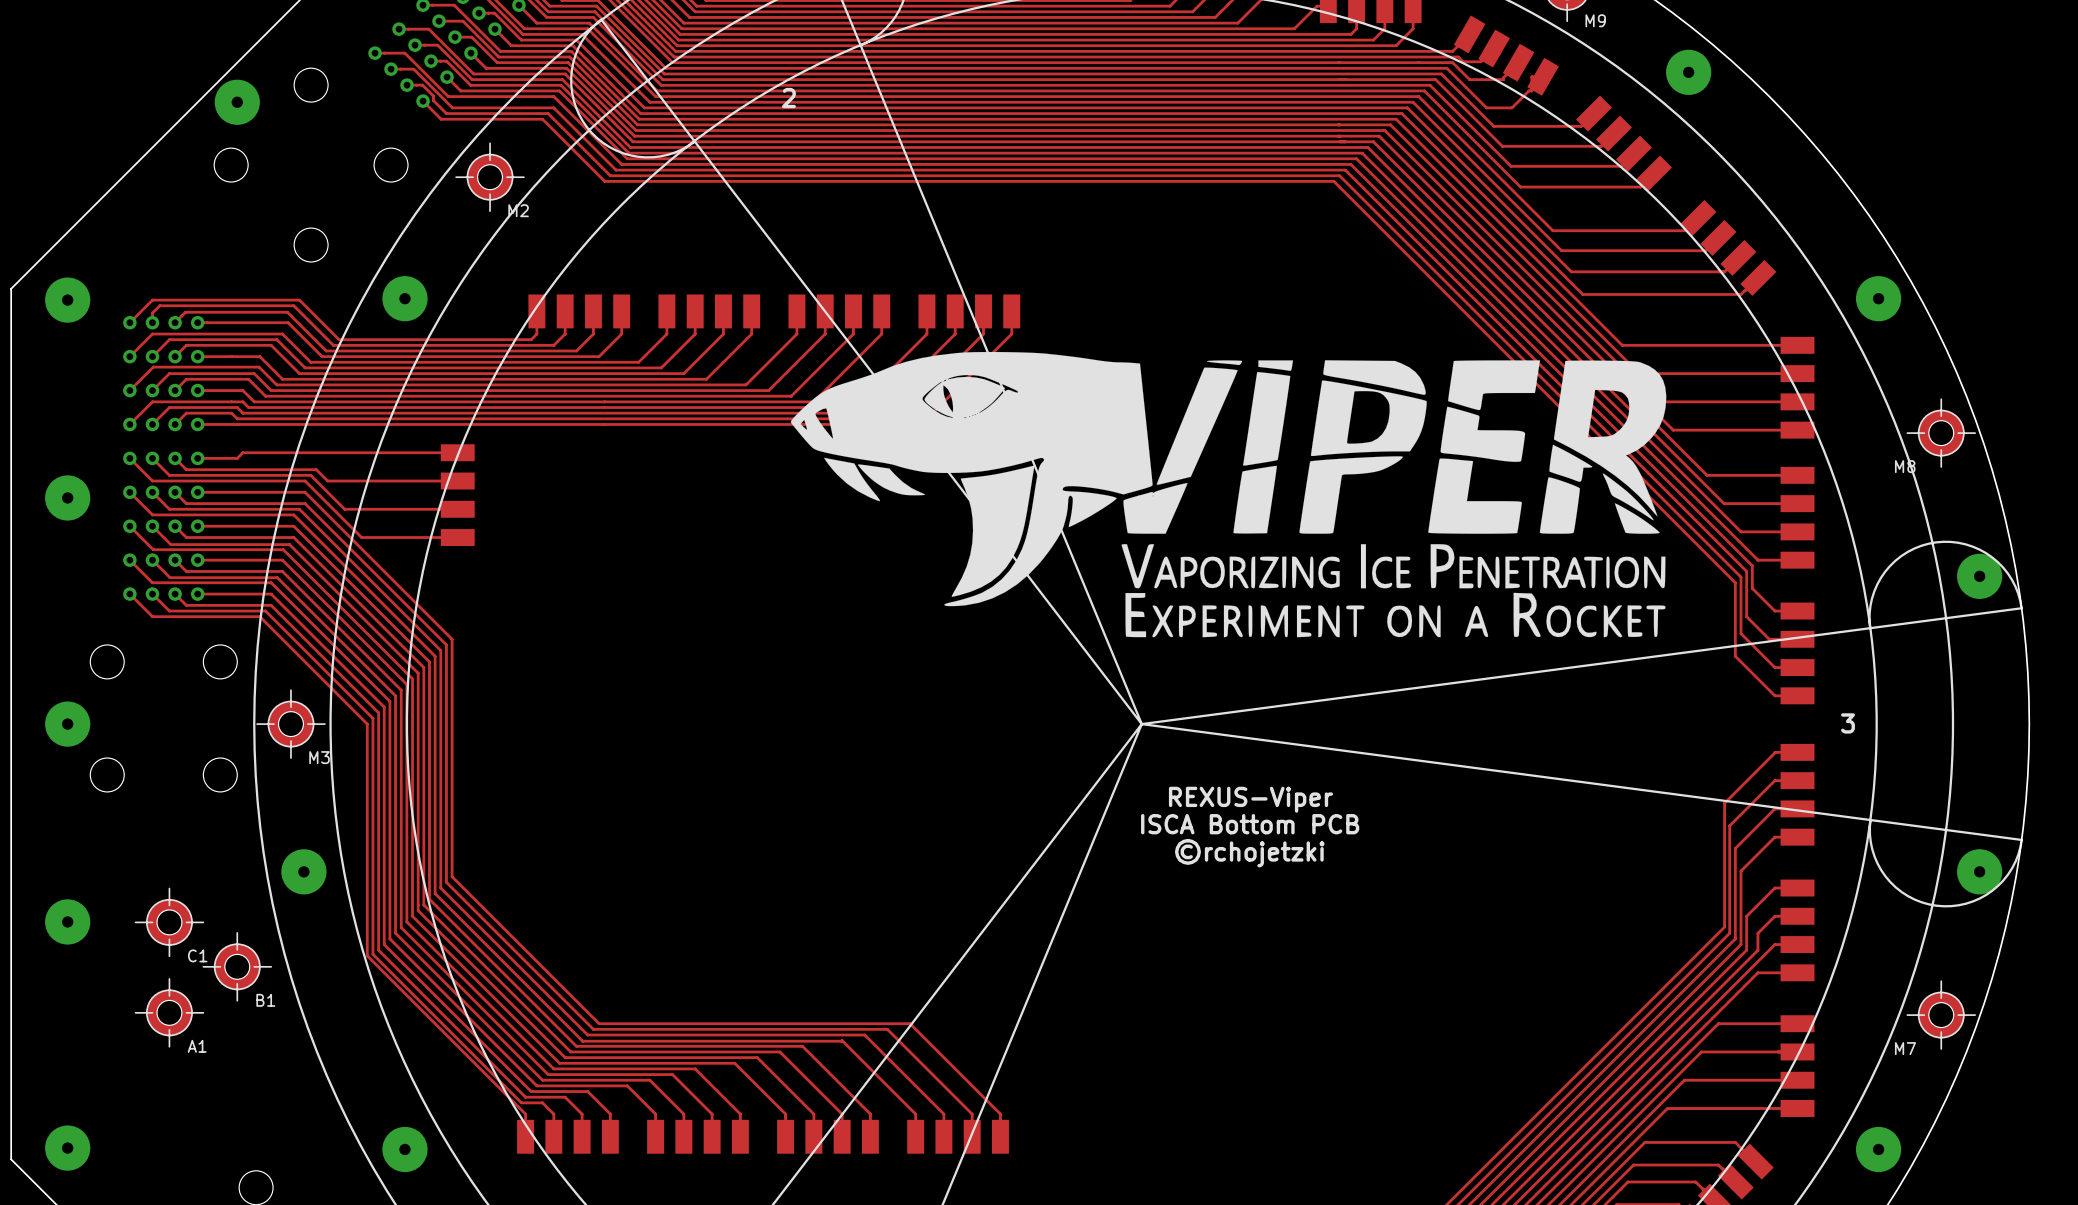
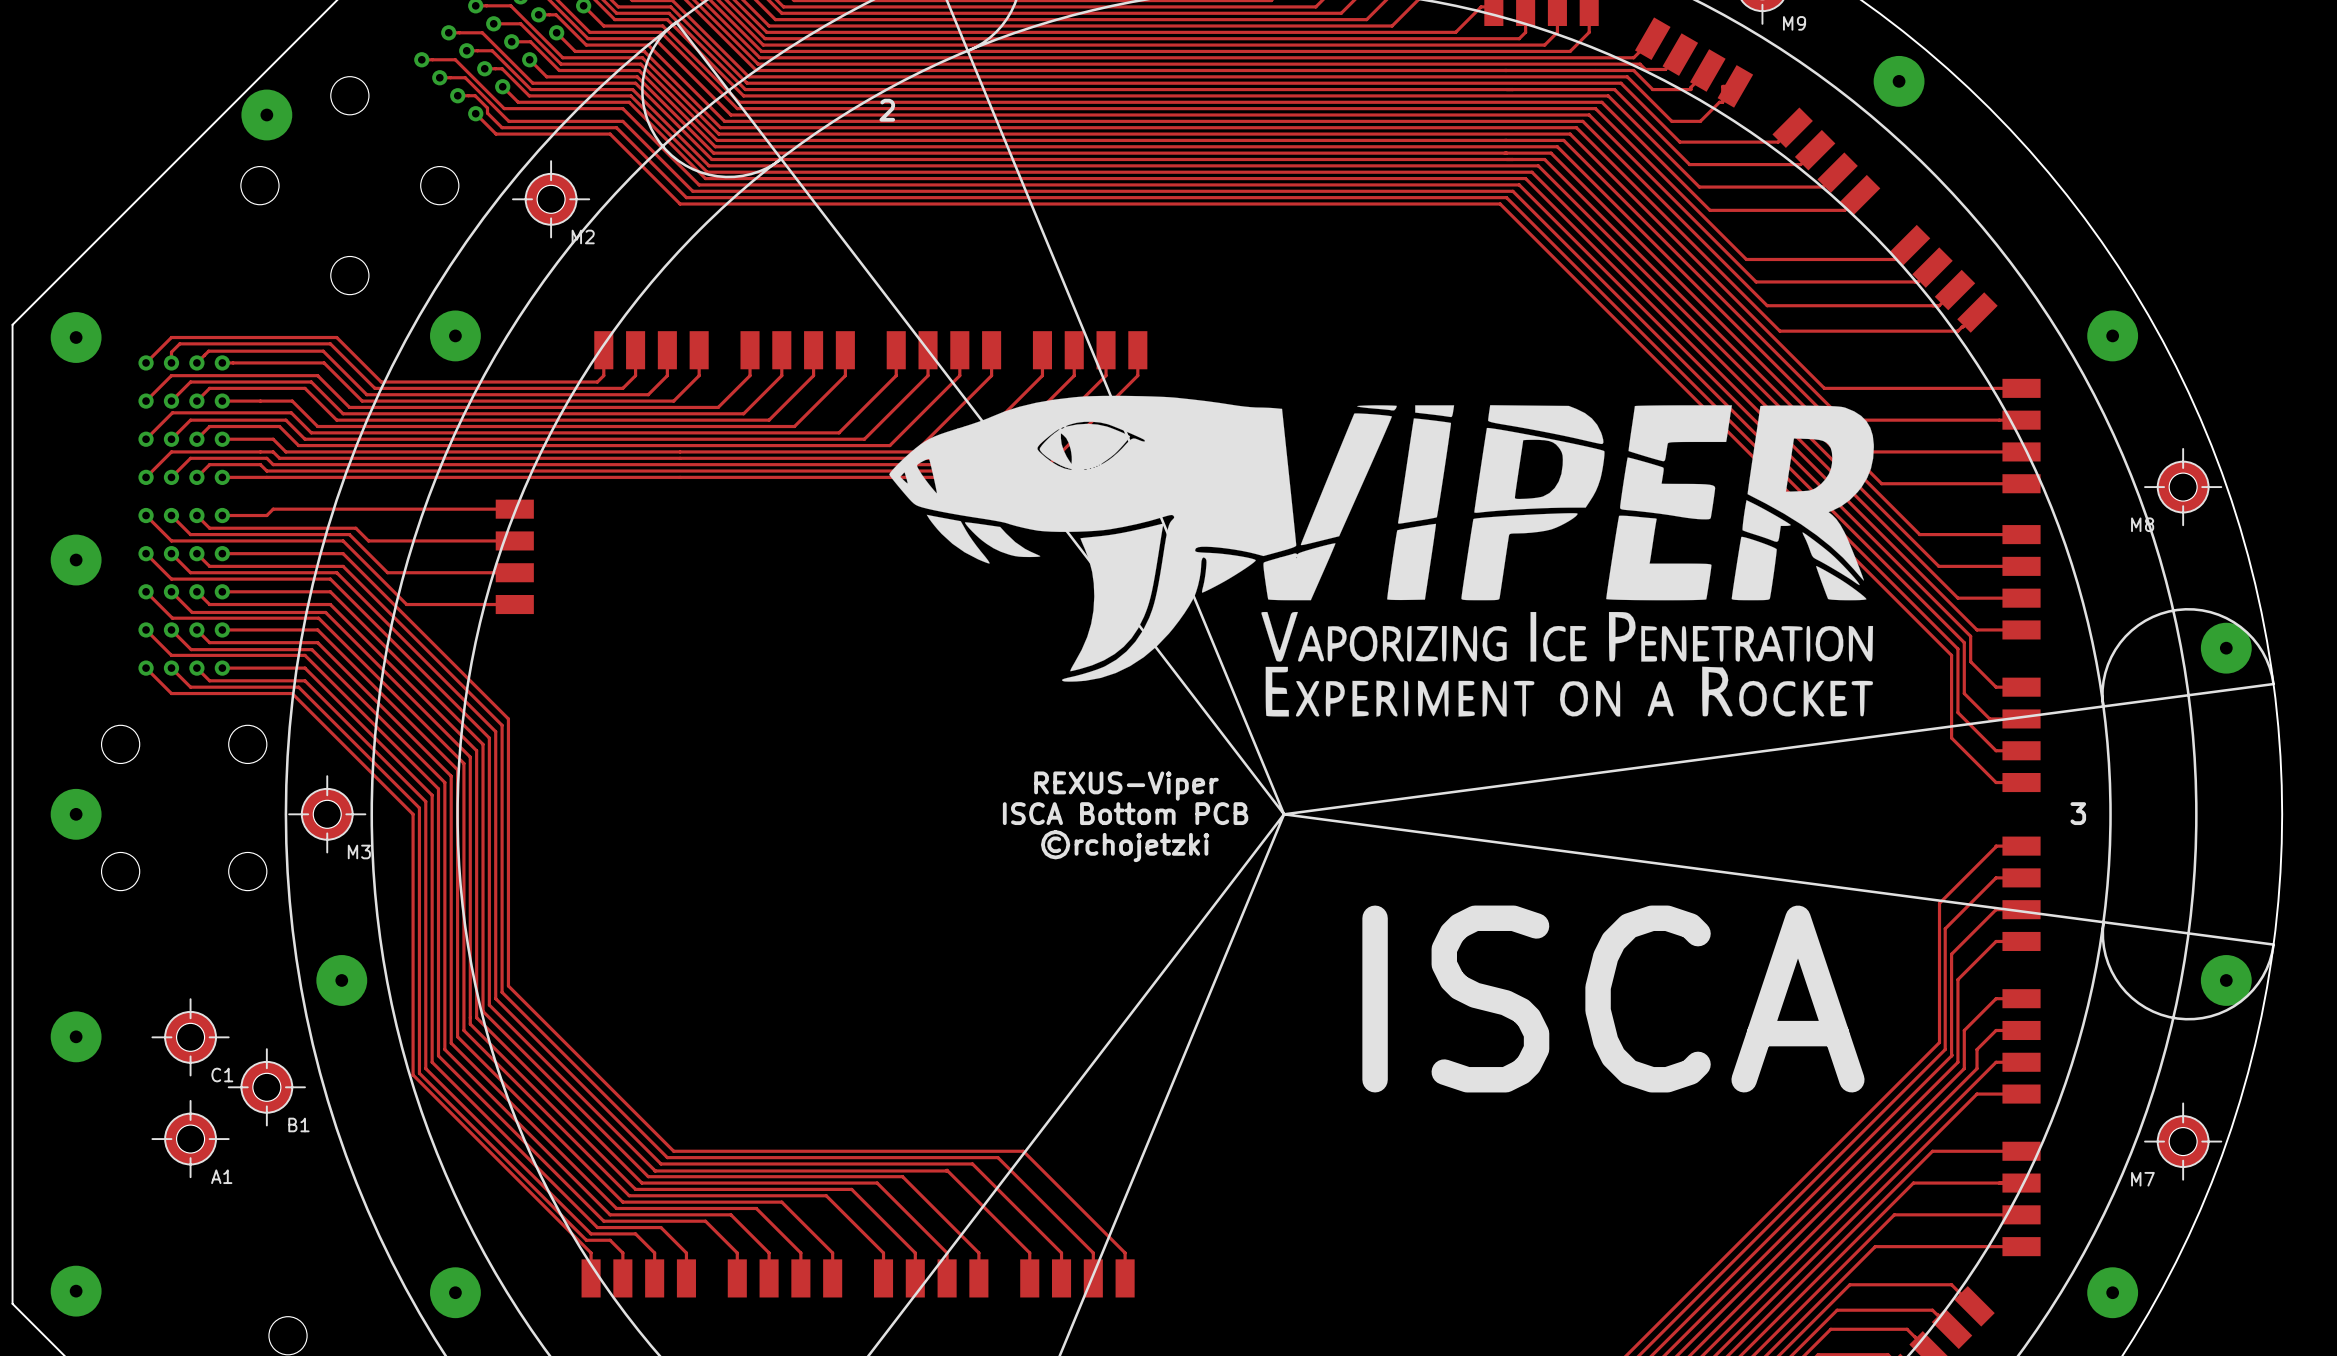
text position: REXUS-Viper (1250, 799) -> REXUS-Viper (1126, 786)
text position: ISCA Bottom PCB (1250, 824) -> ISCA Bottom PCB (1125, 813)
text position: ©rchojetzki (1249, 853) -> ©rchojetzki (1125, 846)
text: none -> ISCA (1613, 999)

